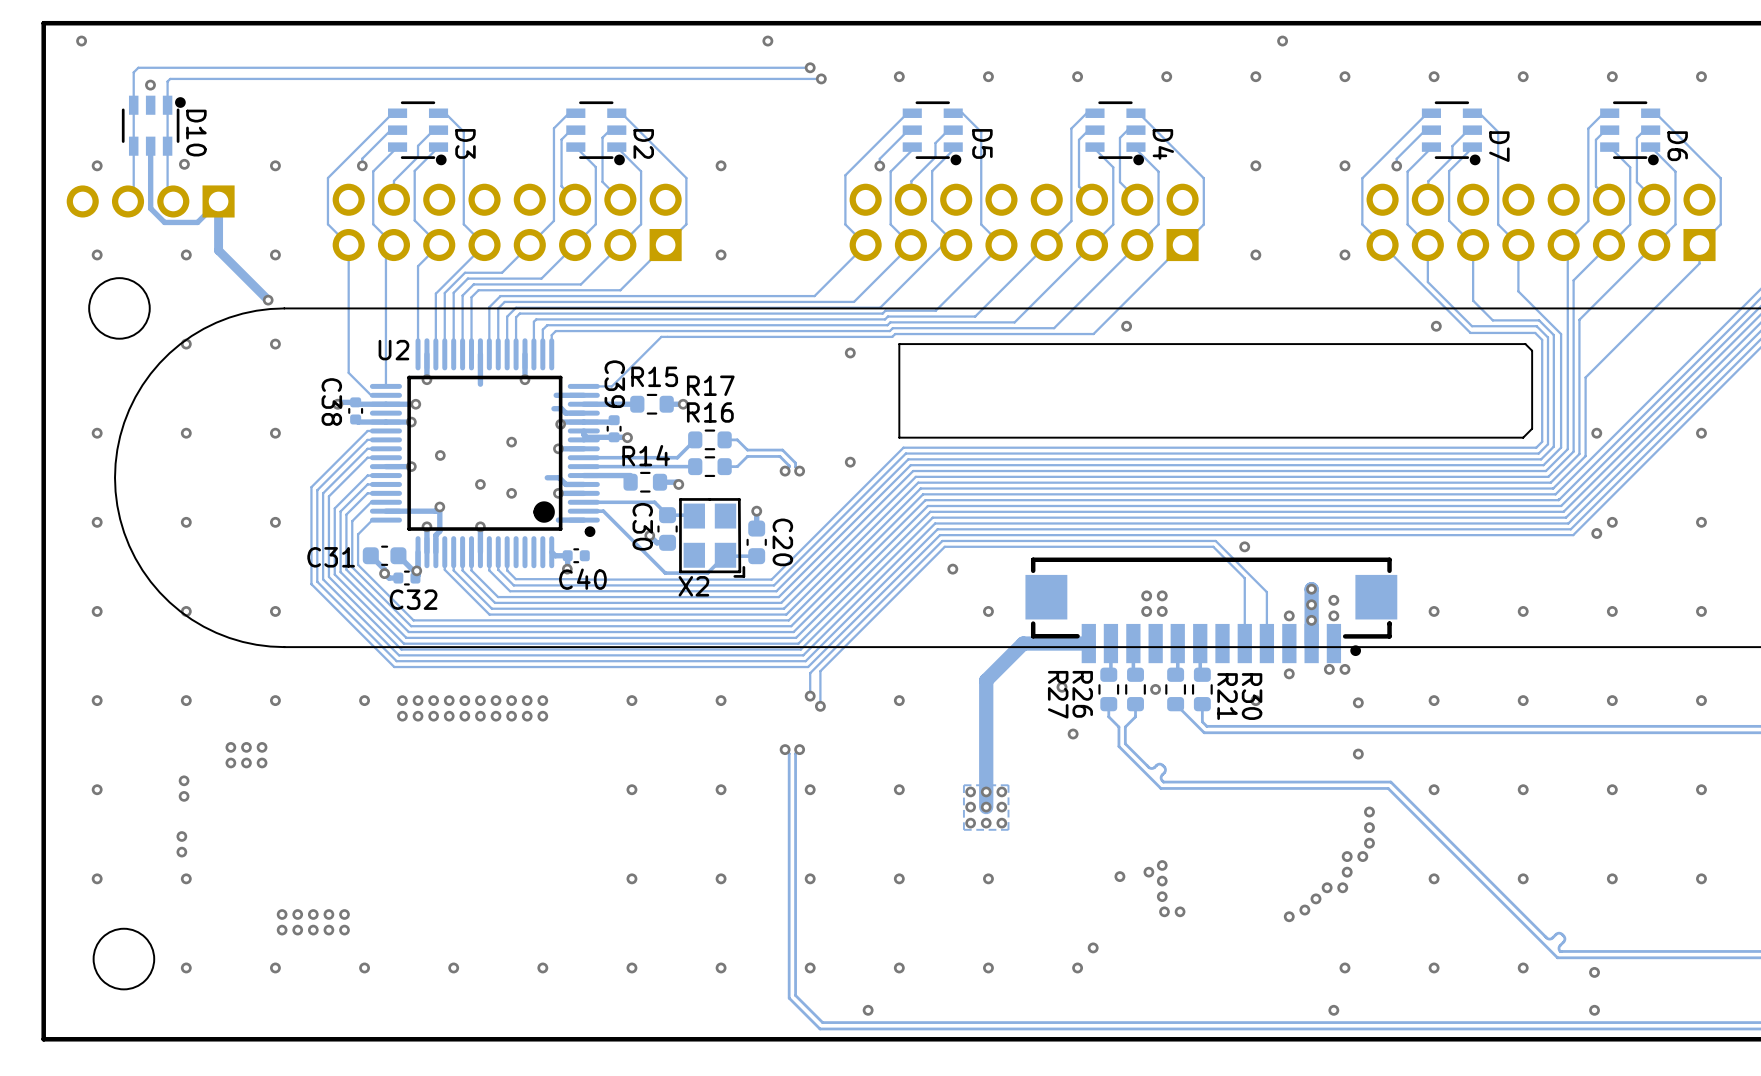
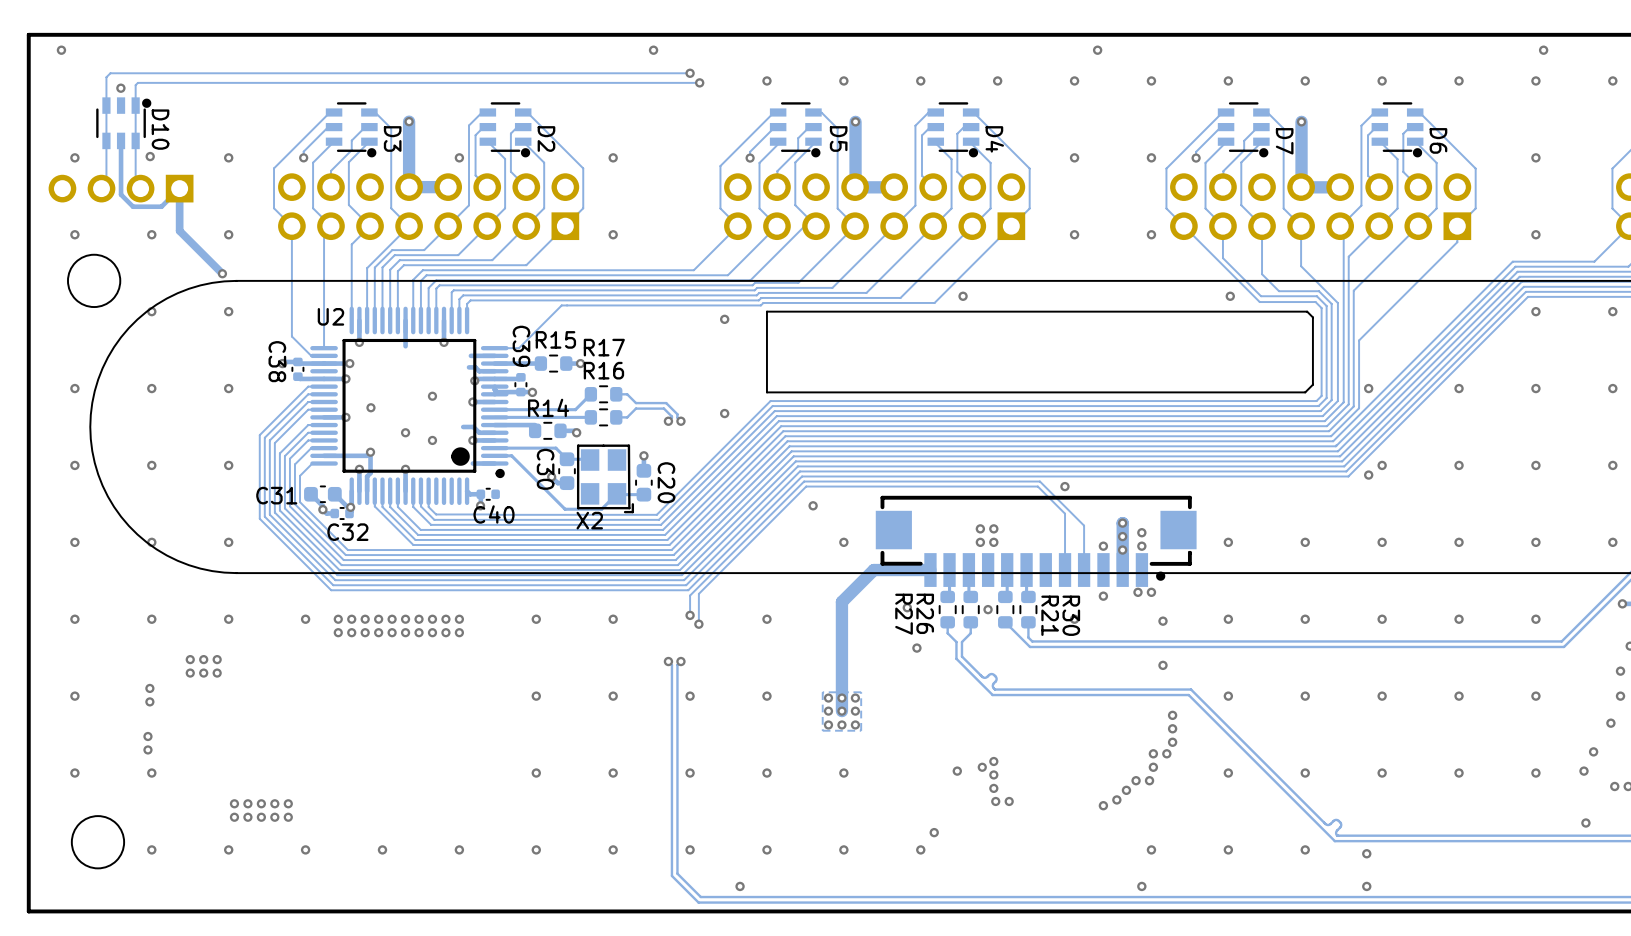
track: none -> (409, 121) (409, 187) (448, 187)
via: none -> (409, 121)
track: none -> (855, 121) (855, 187) (894, 187)
via: none -> (855, 121)
track: none -> (1301, 121) (1301, 187) (1340, 187)
via: none -> (1301, 121)
via: none -> (459, 157)

